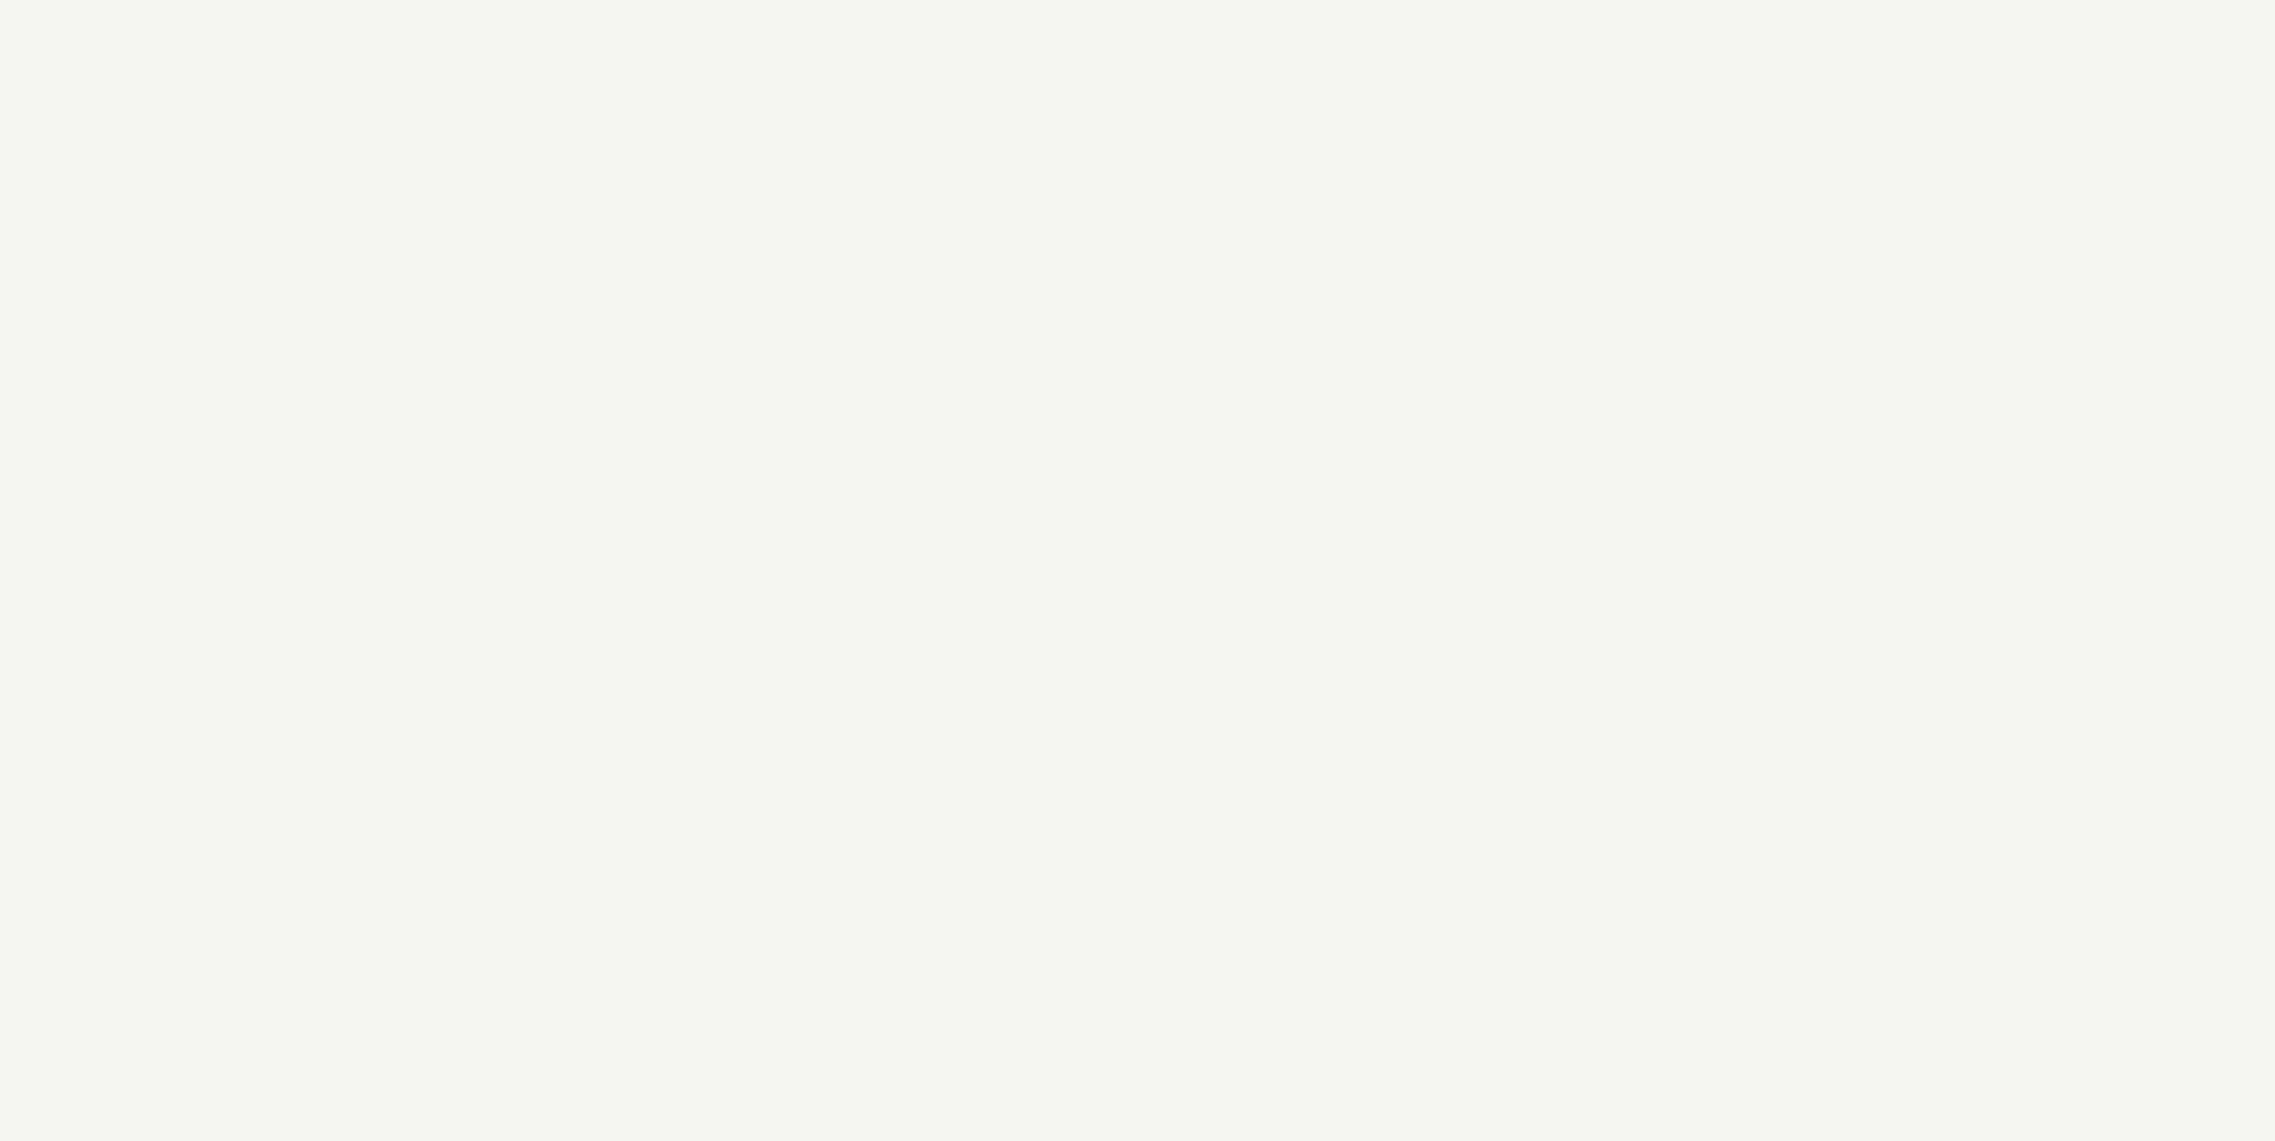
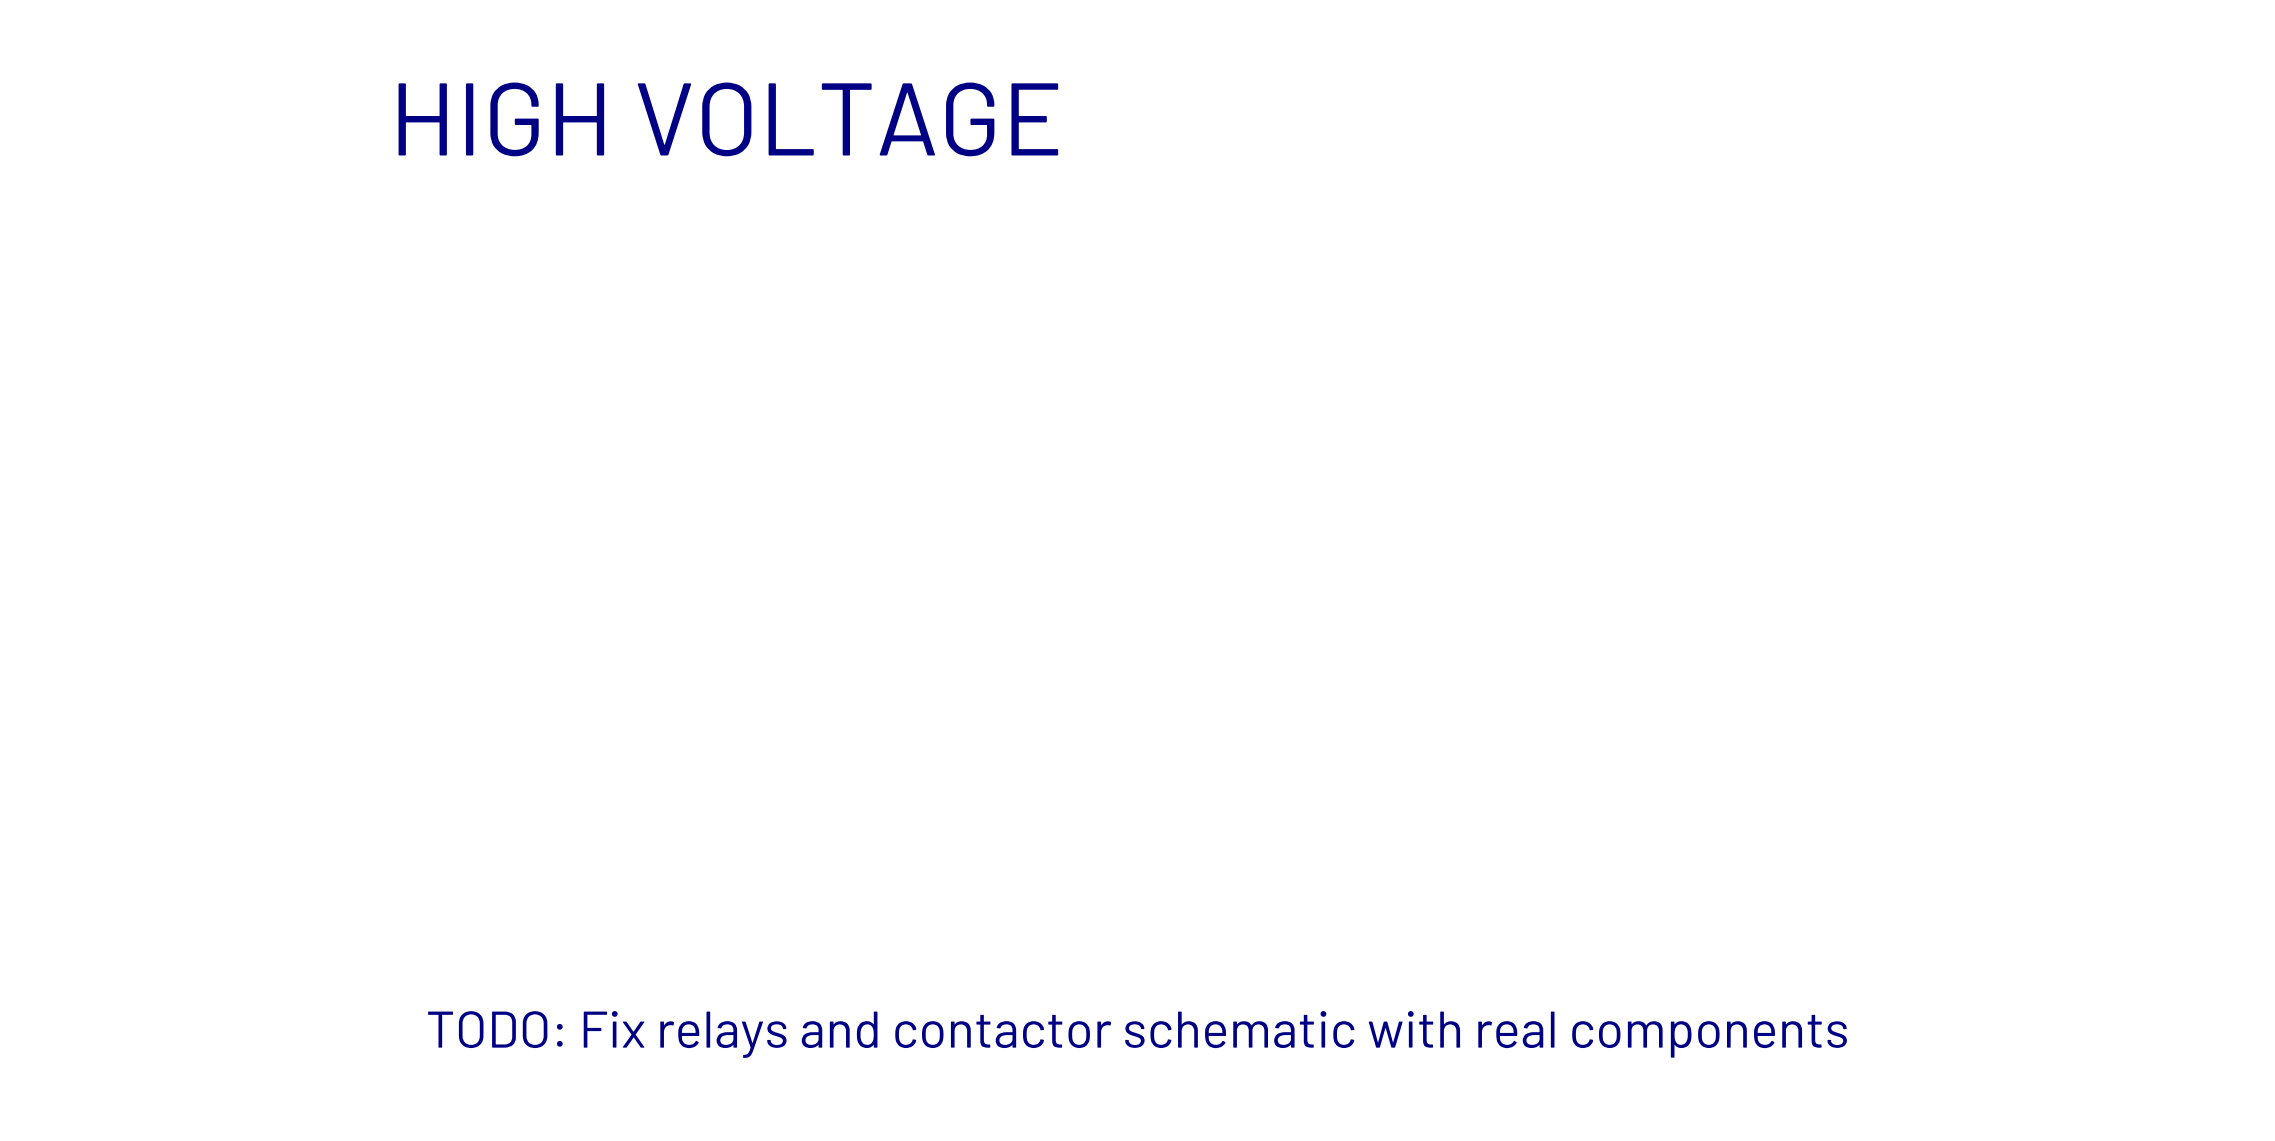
text: none -> HIGH VOLTAGE (728, 119)
text: none -> TODO: Fix relays and contactor schematic with real components (1137, 1034)

